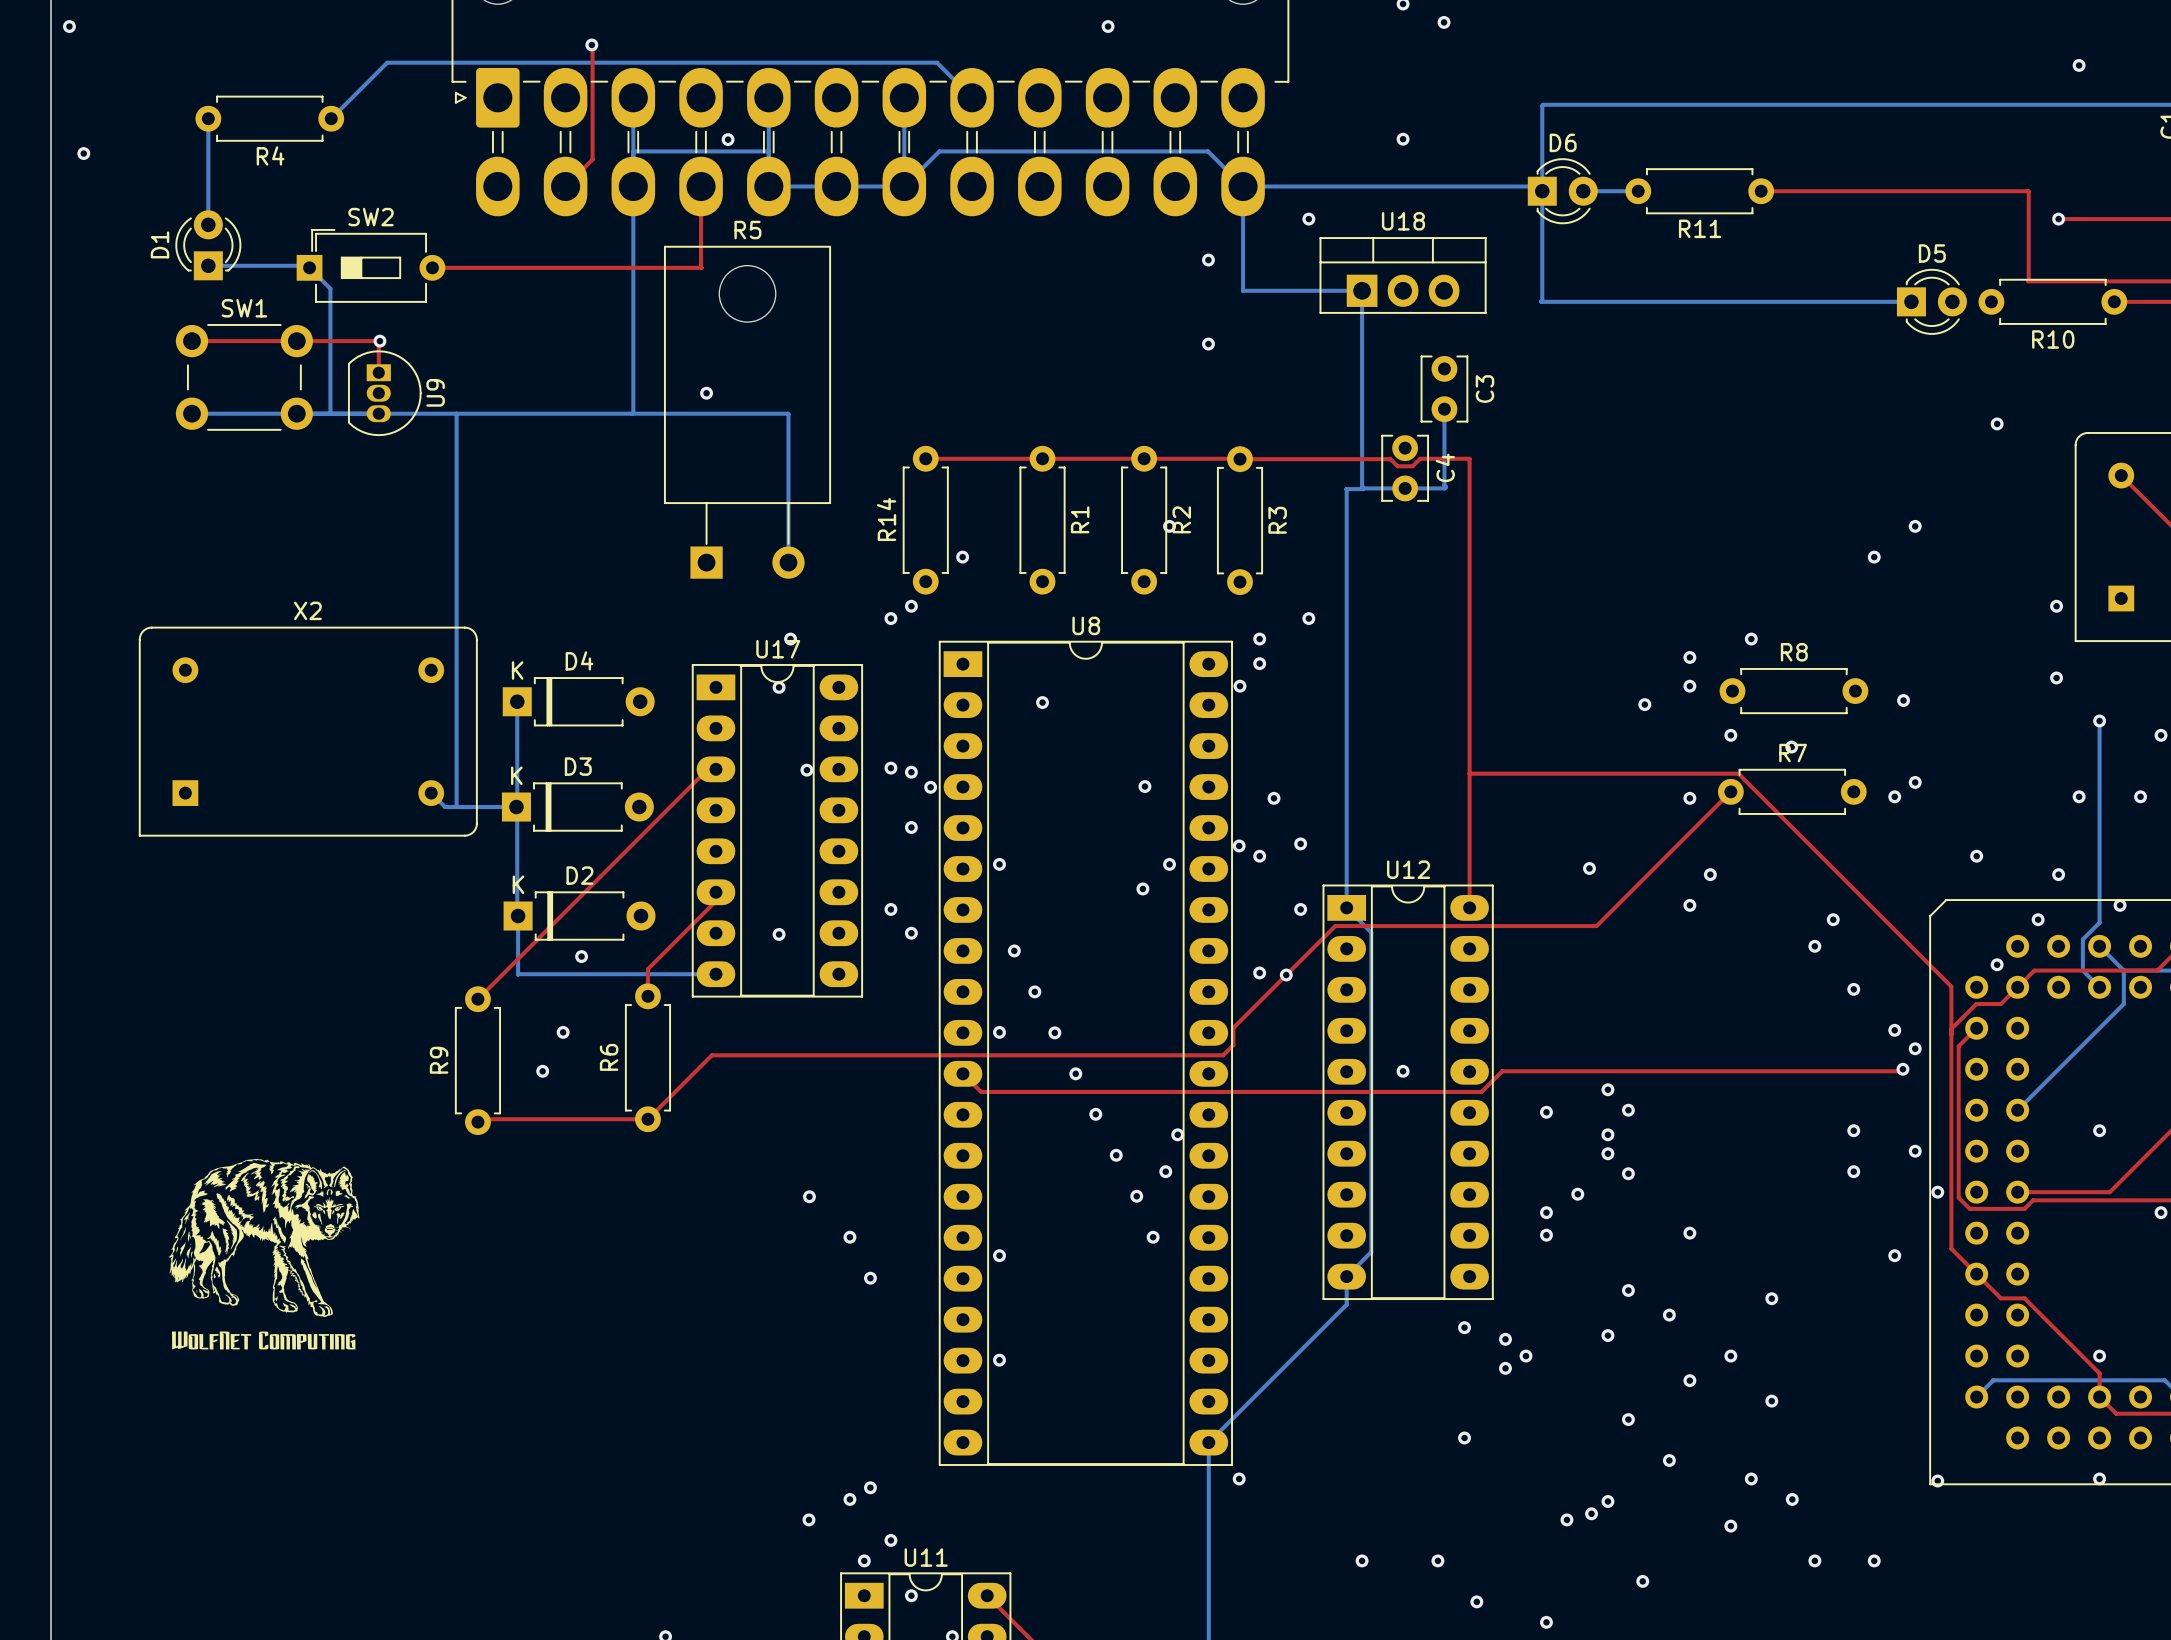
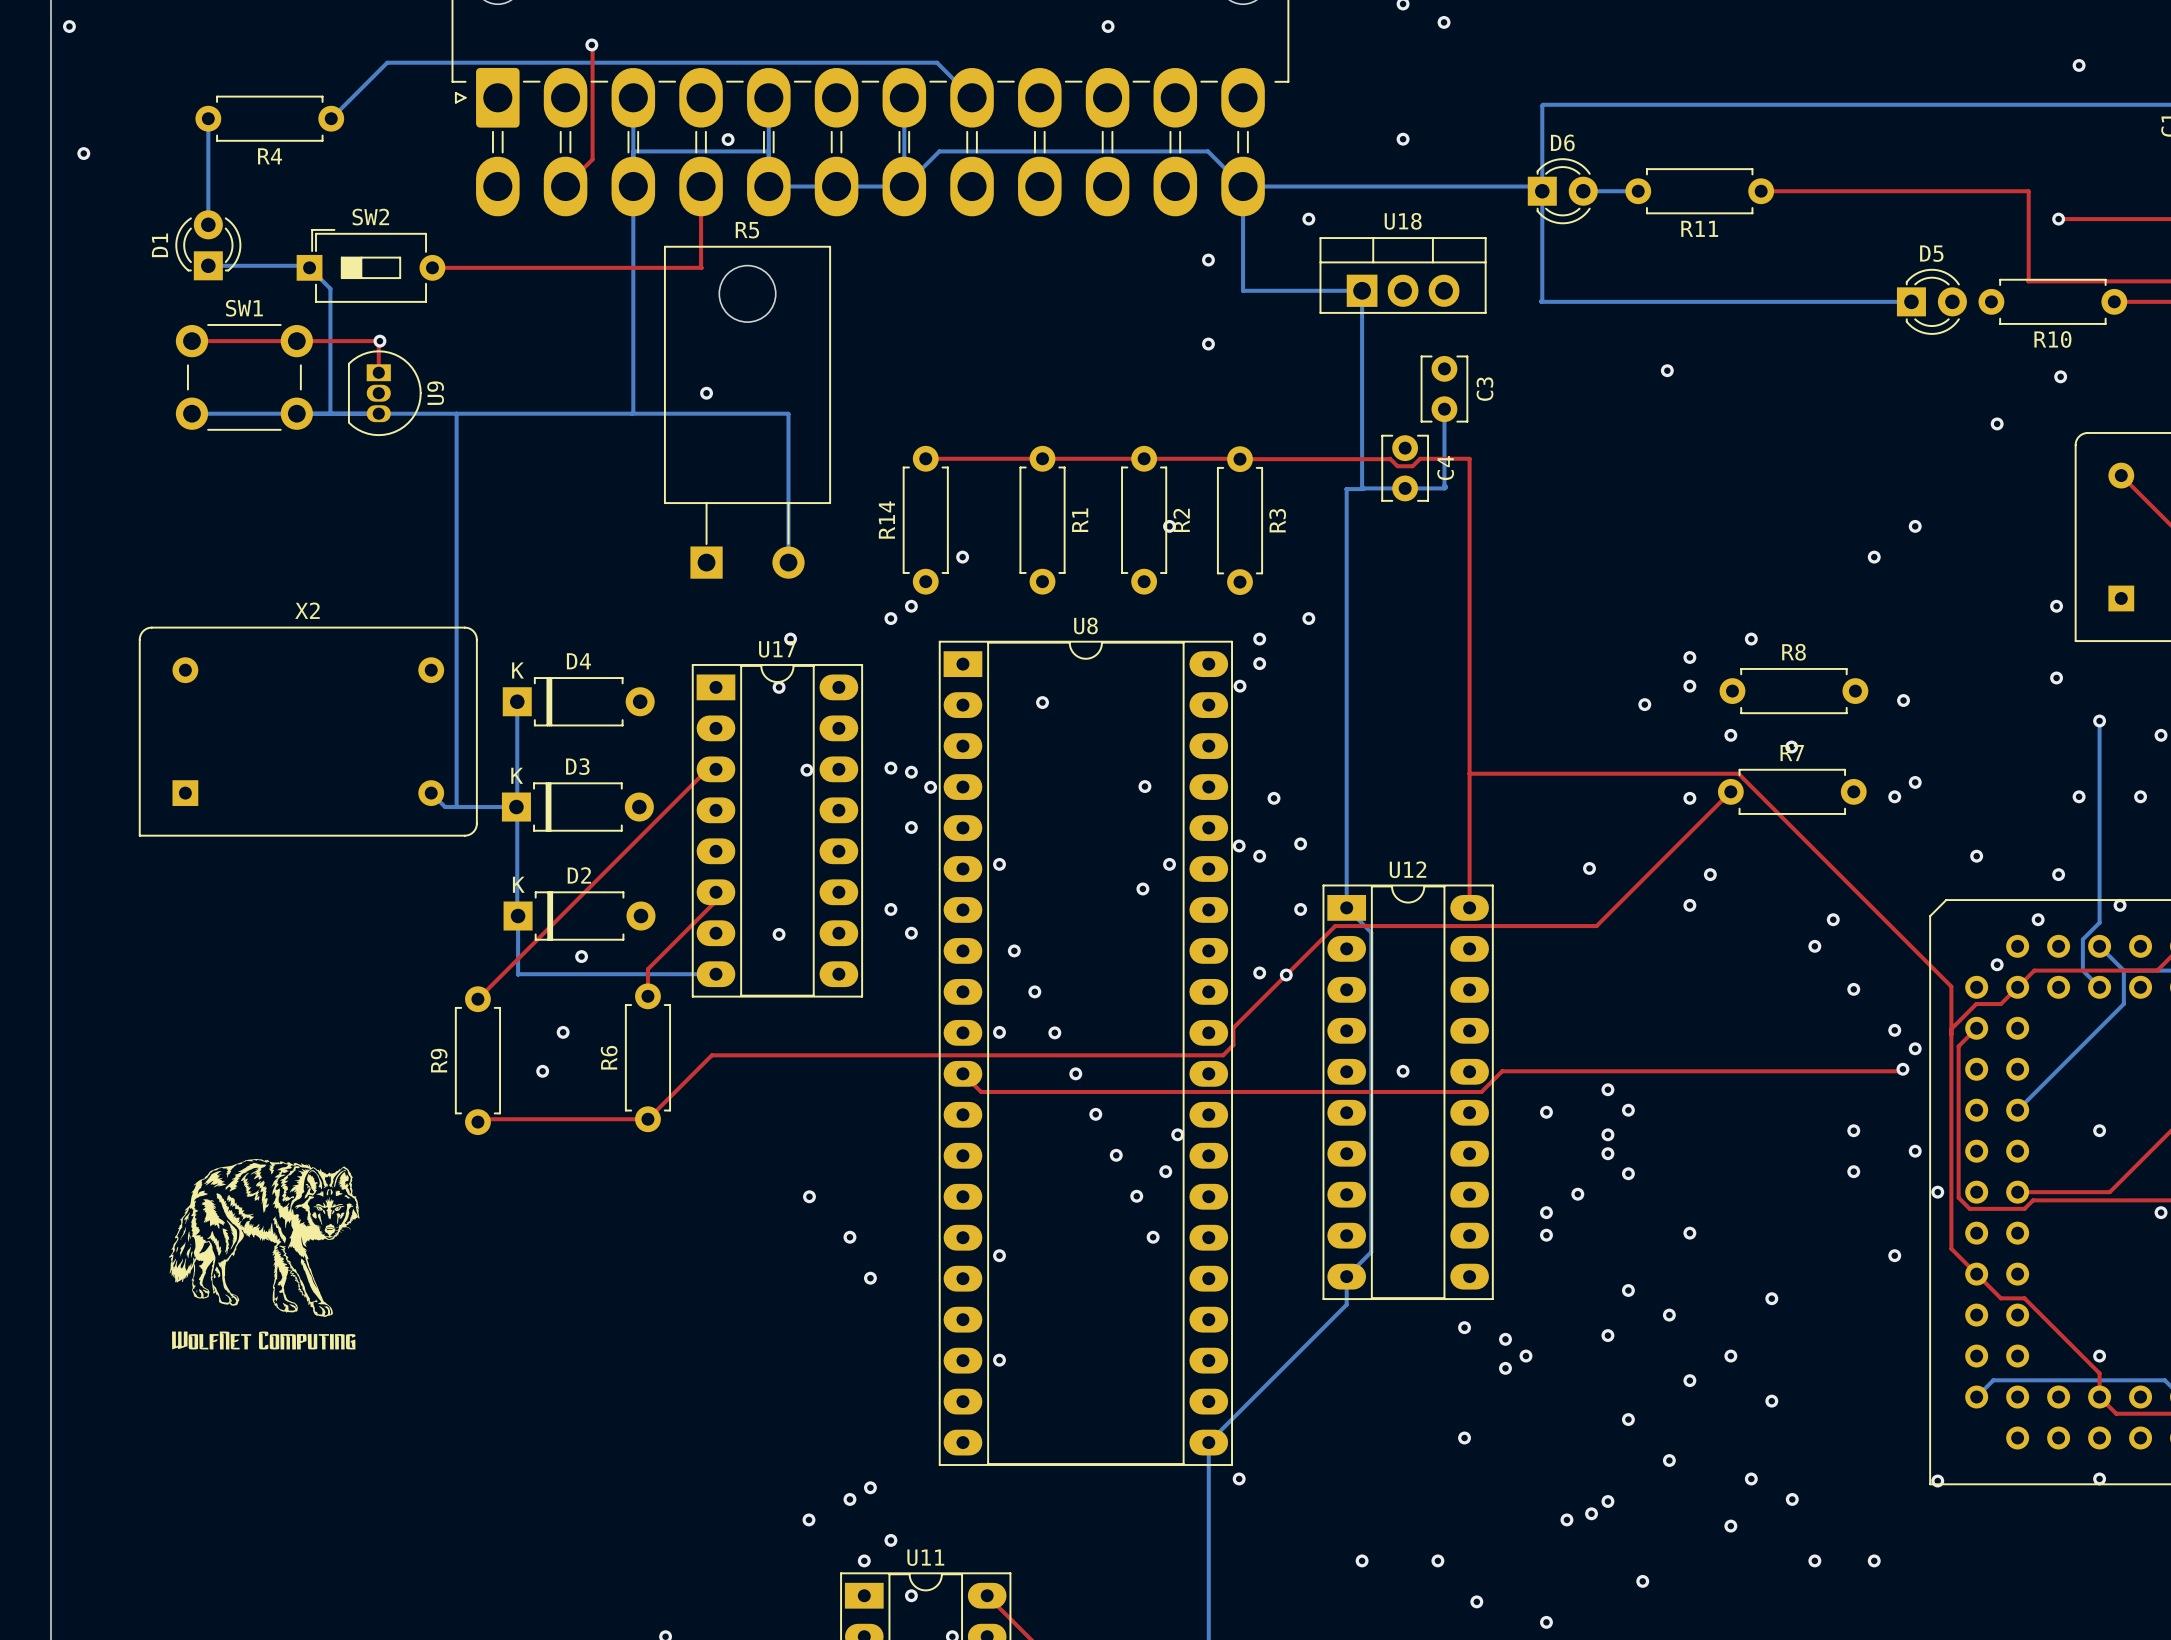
via: none -> (1667, 370)
via: none -> (2060, 376)

